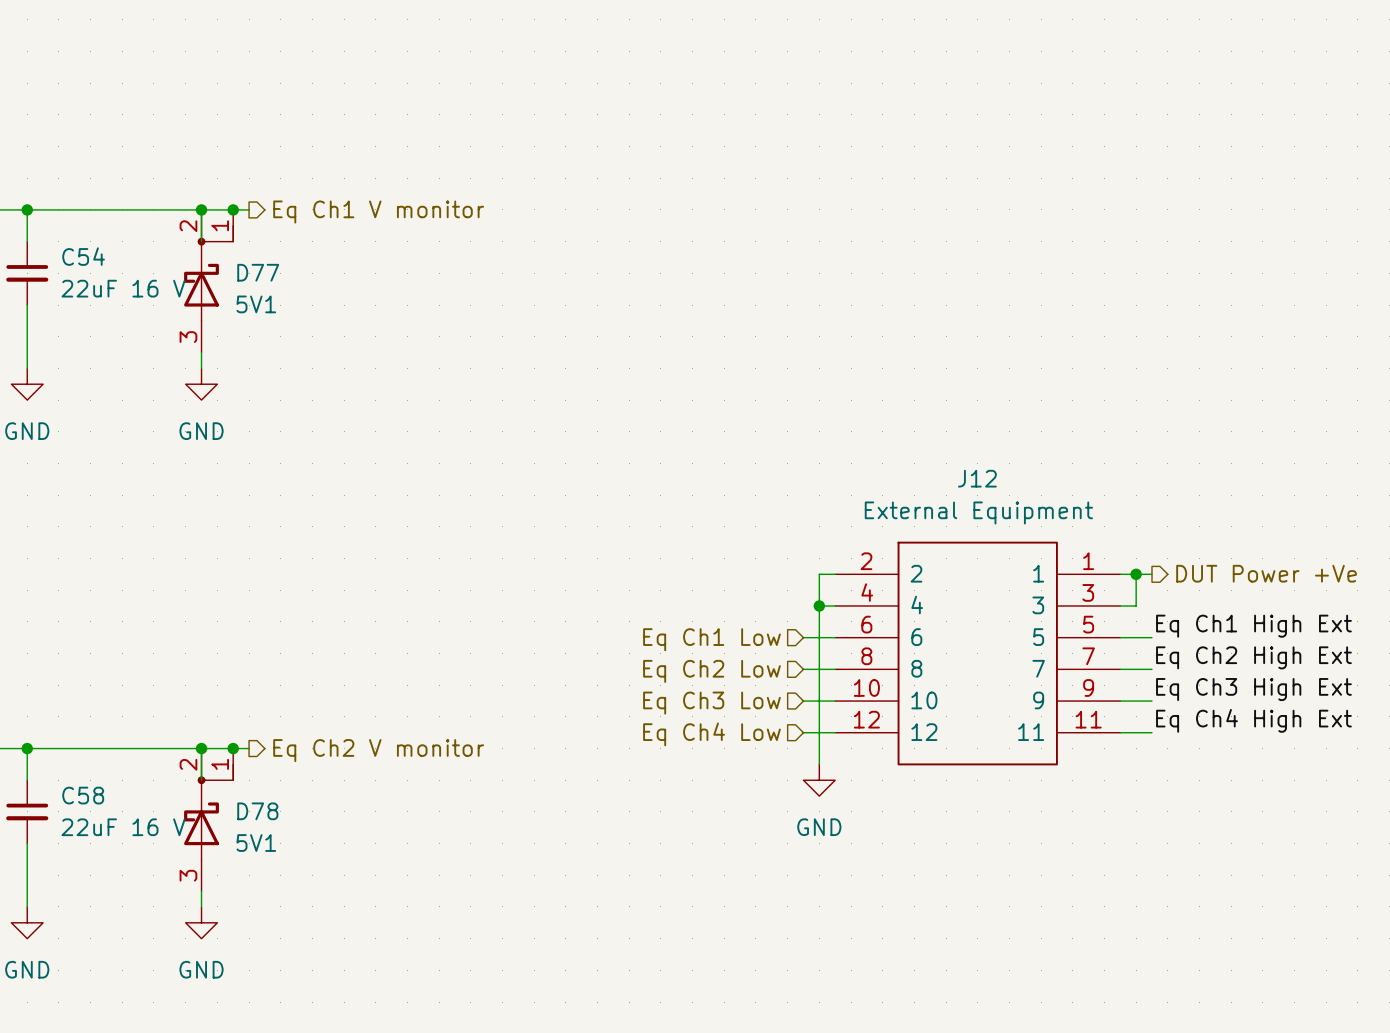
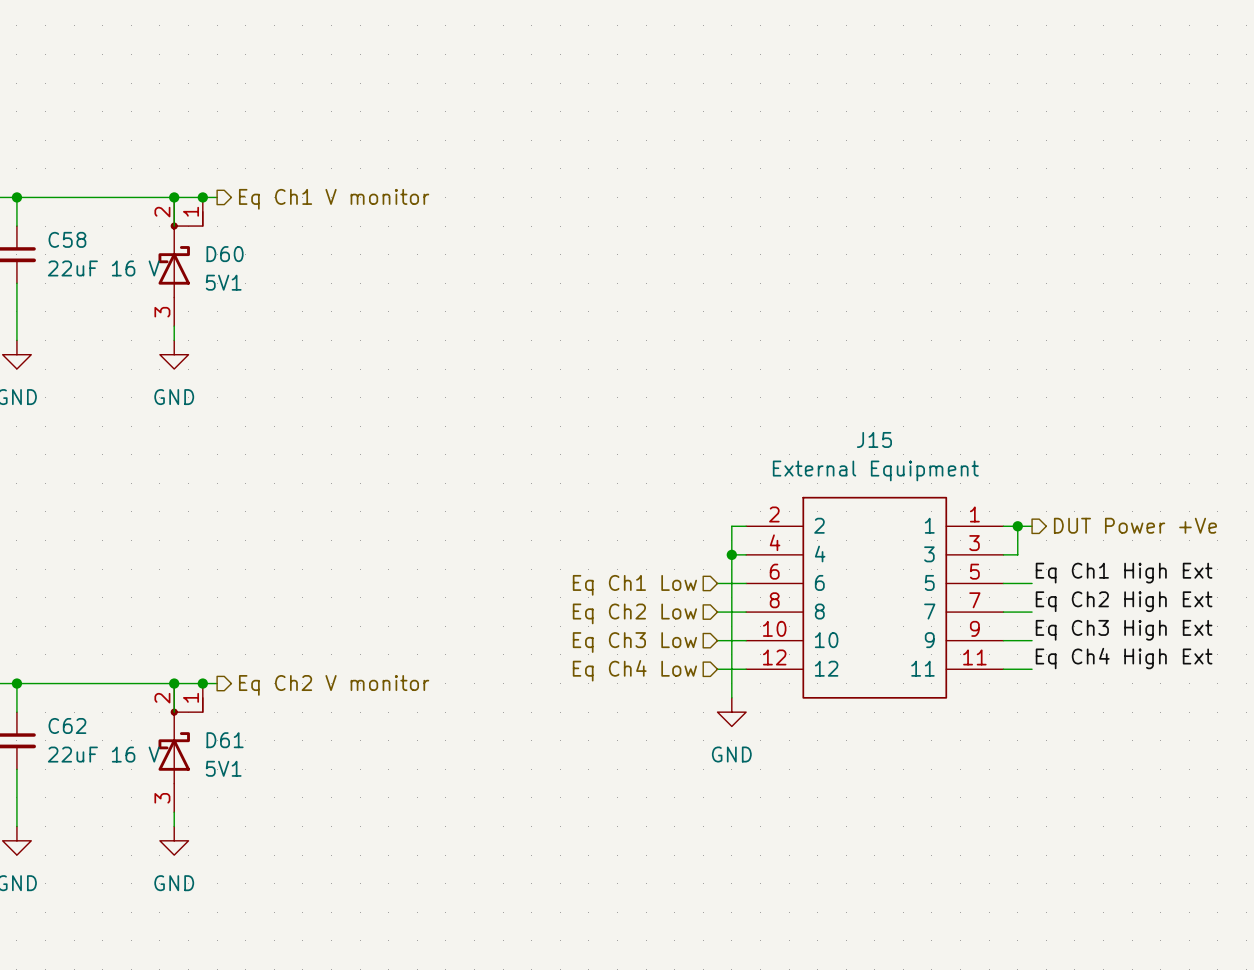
C54 name: C54 (83, 256) -> C58 (67, 239)
D77 name: D77 (258, 272) -> D60 (225, 254)
J12 name: J12 (977, 478) -> J15 (874, 439)
C58 name: C58 (83, 795) -> C62 (67, 725)
D78 name: D78 (257, 811) -> D61 (225, 740)

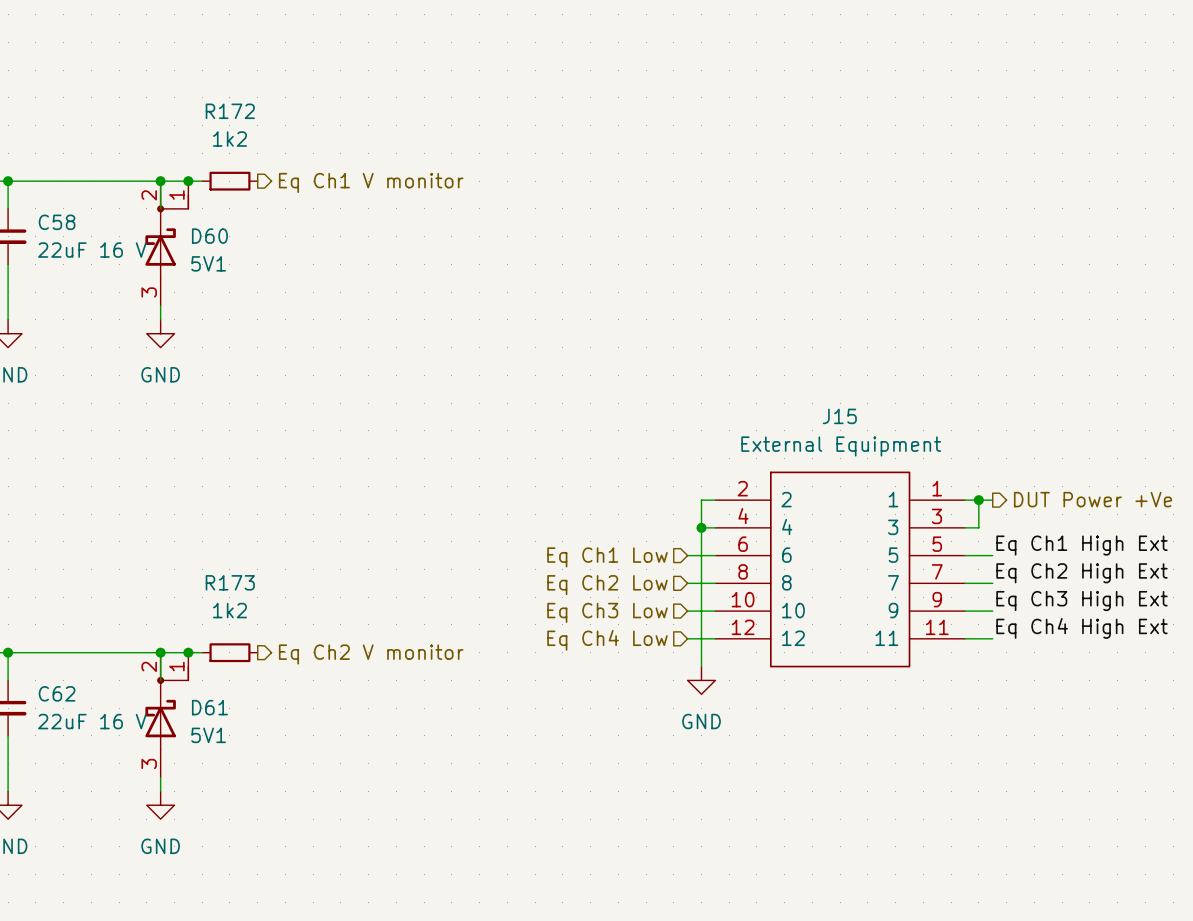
R172: none -> 1k2 (229, 181)
hierarchical label position: Eq Ch1 V monitor (334, 199) -> Eq Ch1 V monitor (371, 182)
R173: none -> 1k2 (229, 652)
hierarchical label position: Eq Ch2 V monitor (334, 685) -> Eq Ch2 V monitor (371, 654)

